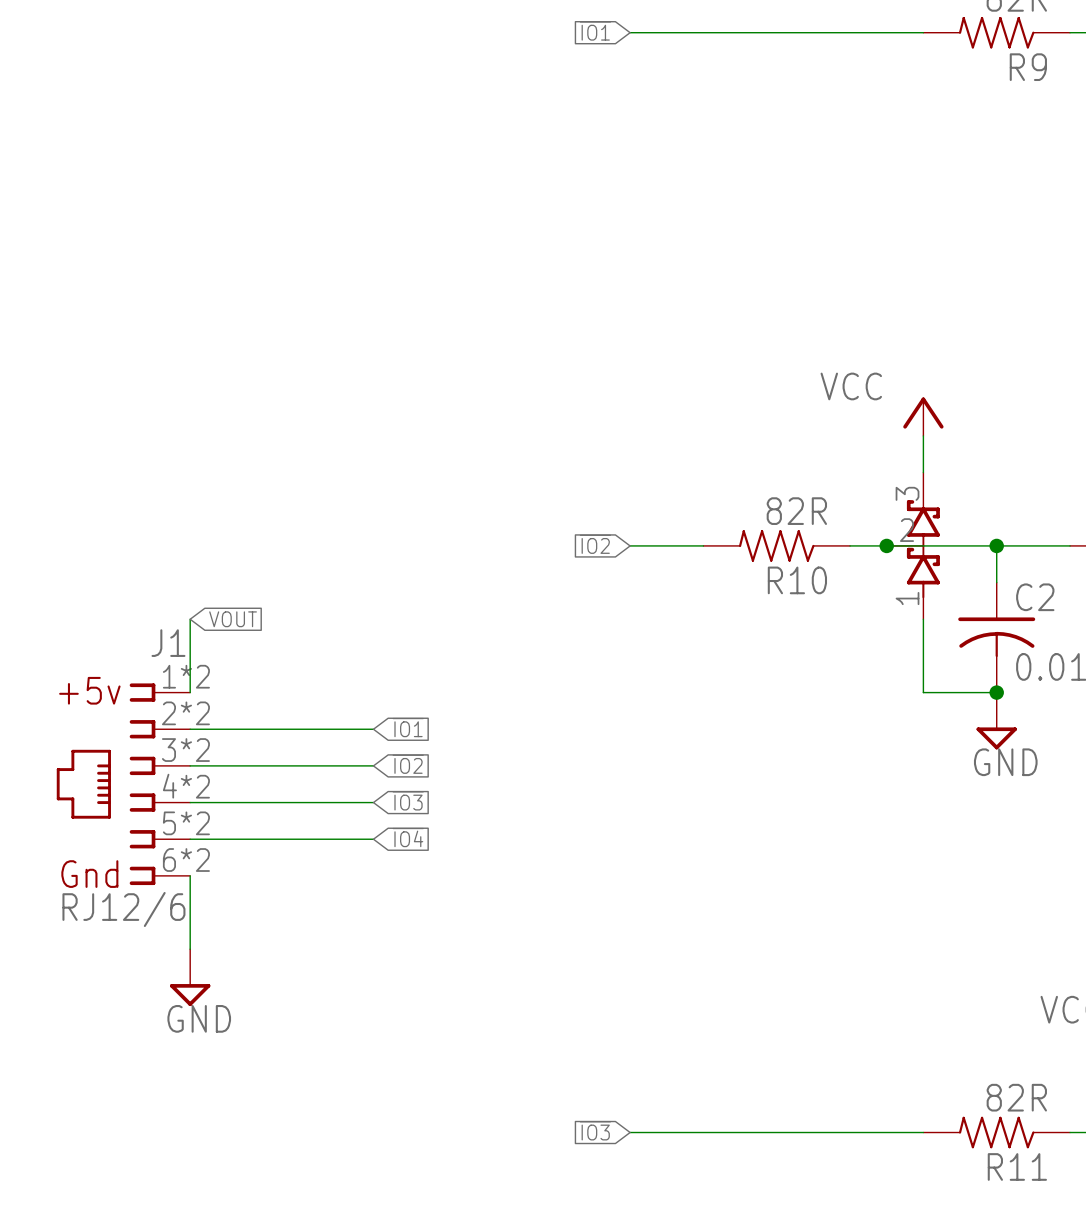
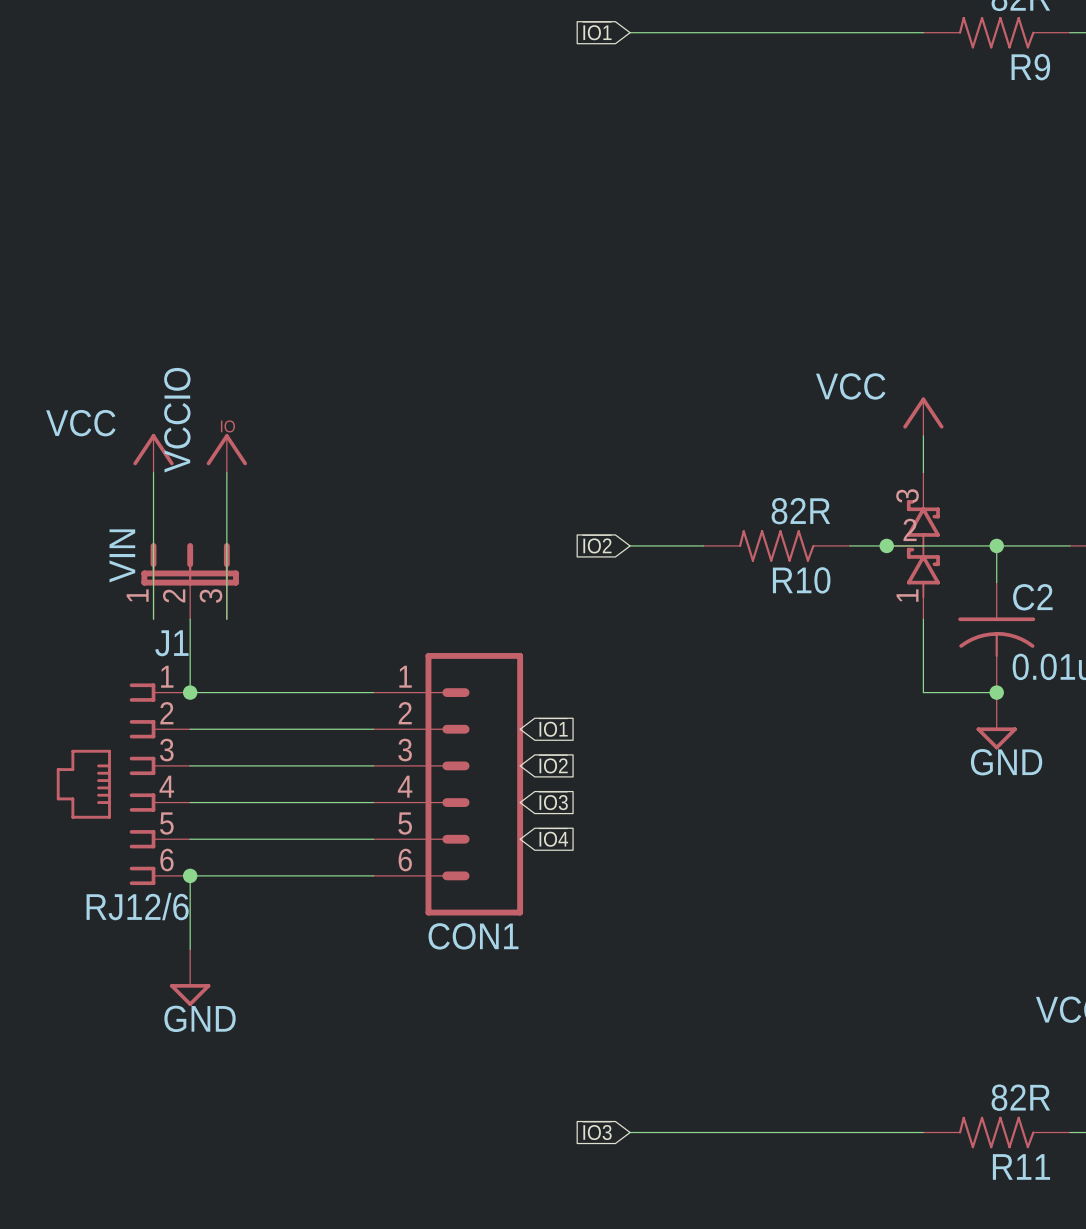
power symbol: none -> VCC (153, 453)
power symbol: none -> VCCIO (226, 453)
wire: none -> (153, 472) (153, 619)
wire: none -> (226, 472) (226, 619)
VIN: none -> (190, 581)
global label: VOUT (233, 619) -> none
J1 pin number: 1*2 (186, 676) -> 1 (167, 676)
J1 text: +5v (89, 690) -> none
wire: none -> (190, 692) (373, 692)
junction: none -> (190, 692)
J1 pin number: 2*2 (185, 713) -> 2 (166, 713)
global label position: ~{IO1} (408, 727) -> ~{IO1} (553, 727)
J1 pin number: 3*2 (185, 750) -> 3 (166, 750)
global label position: ~{IO2} (408, 764) -> ~{IO2} (553, 764)
CON1: none -> (448, 784)
J1 pin number: 4*2 (186, 786) -> 4 (166, 786)
global label position: ~{IO3} (408, 800) -> ~{IO3} (553, 800)
J1 pin number: 5*2 (186, 823) -> 5 (166, 823)
global label position: ~{IO4} (408, 837) -> ~{IO4} (553, 837)
J1 pin number: 6*2 (186, 860) -> 6 (166, 860)
J1 text: Gnd (89, 874) -> none
wire: none -> (190, 875) (373, 875)
junction: none -> (190, 875)

